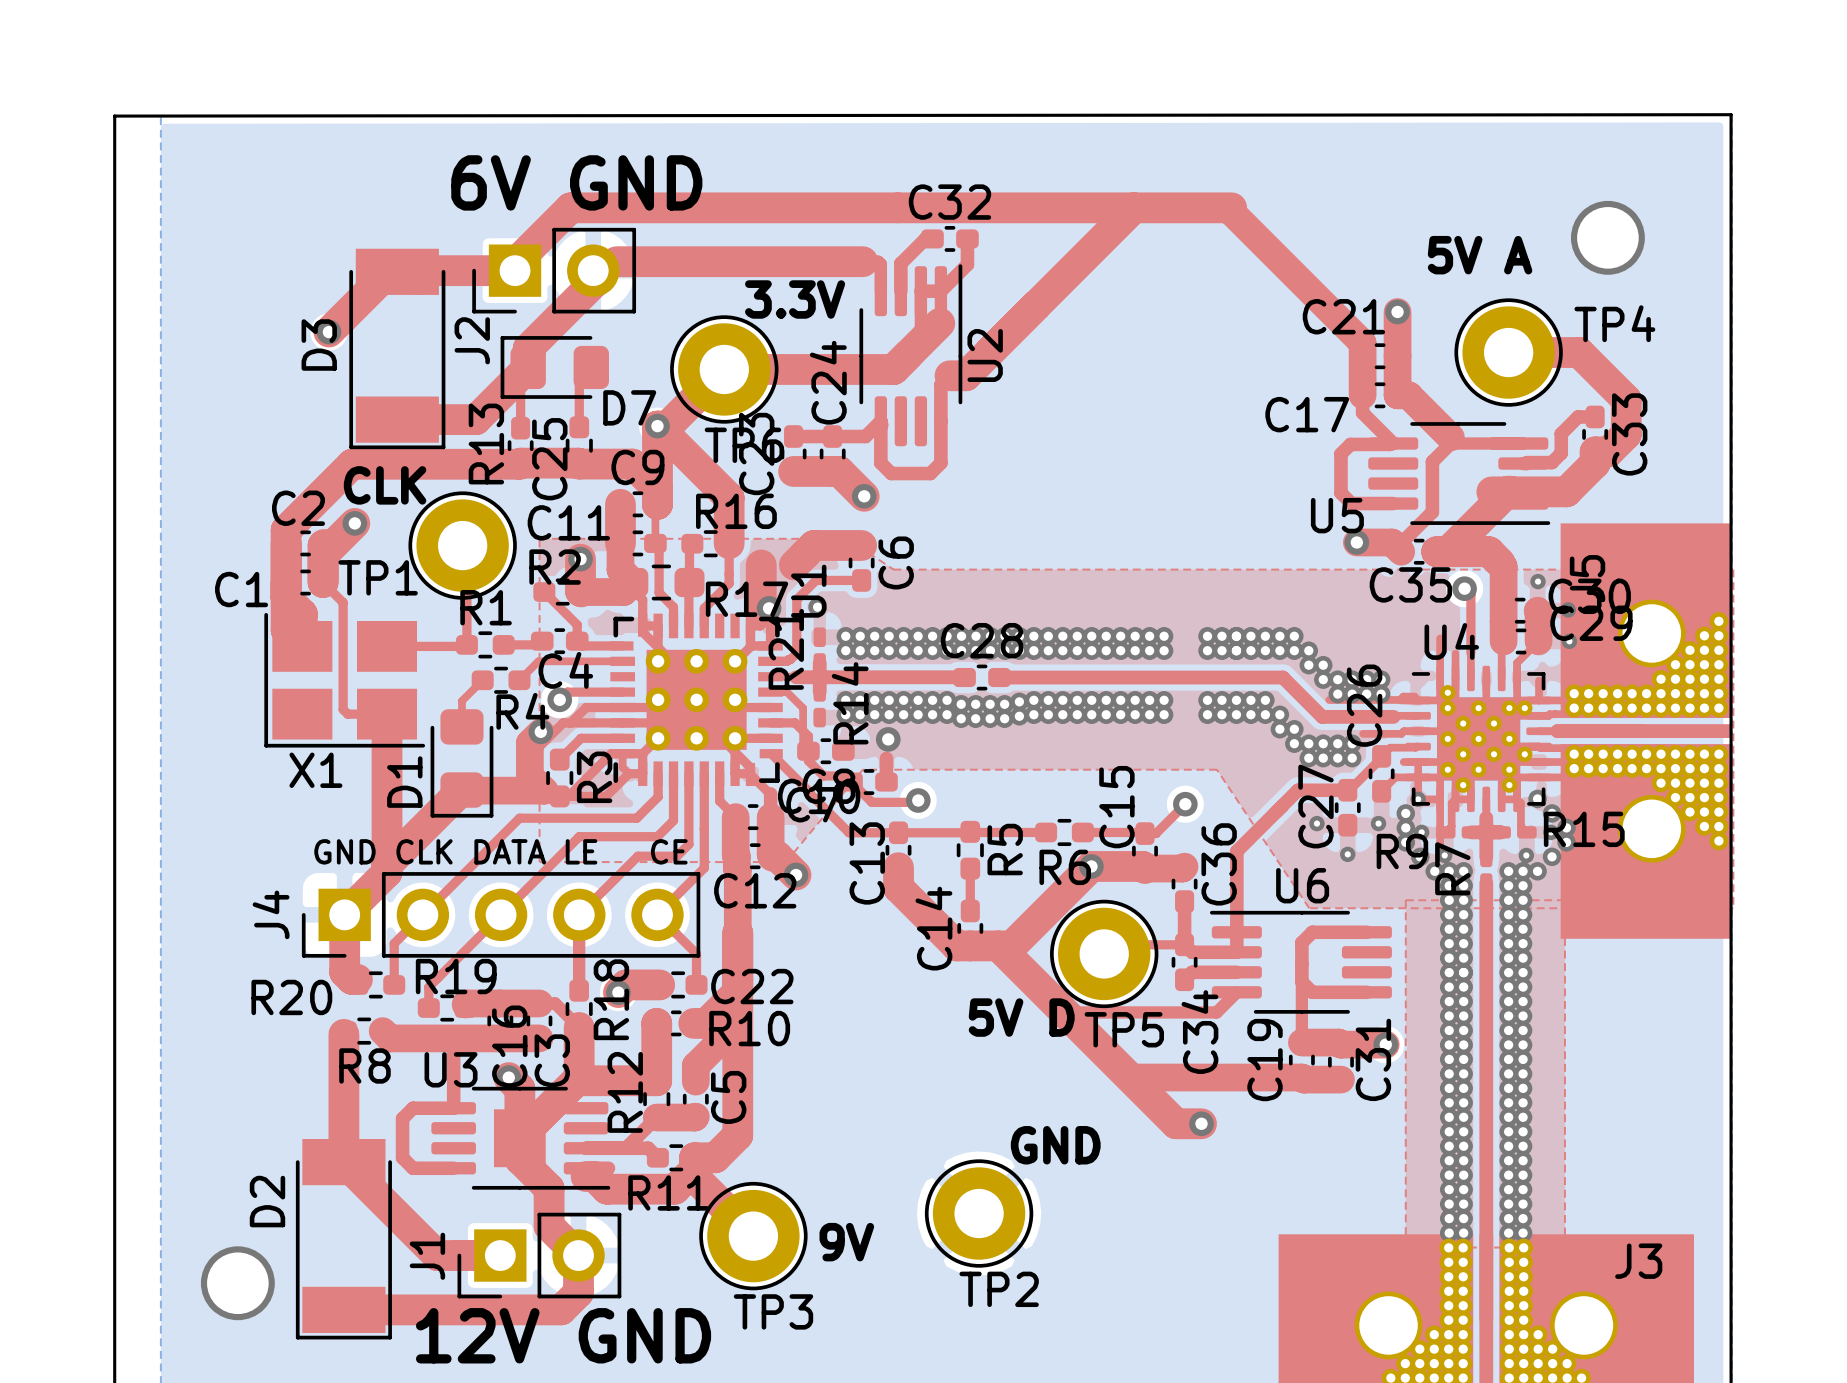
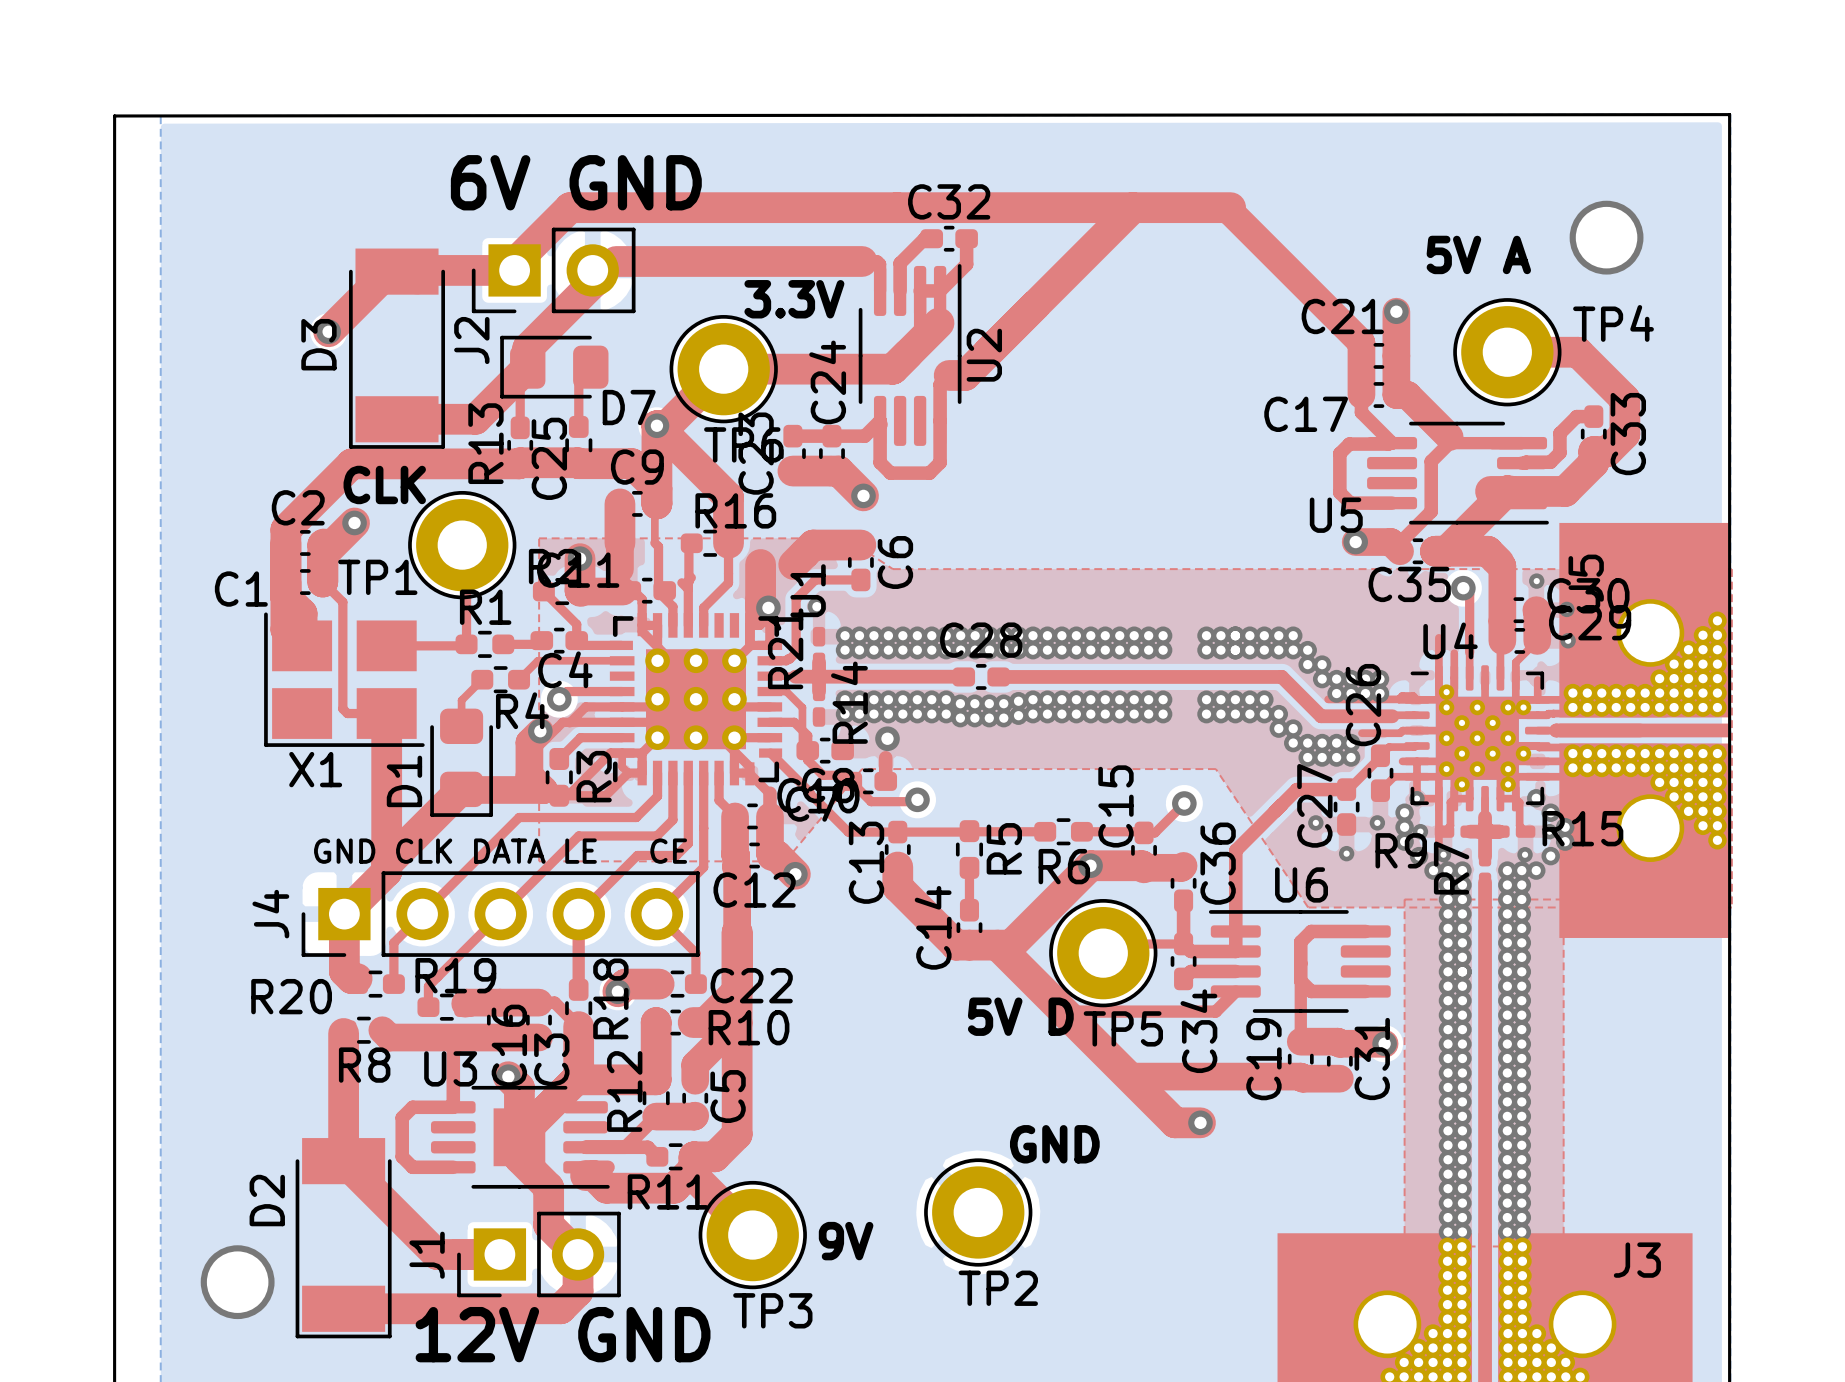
C11 position: (637, 543) -> (647, 590)
R17: (661, 582) -> none

